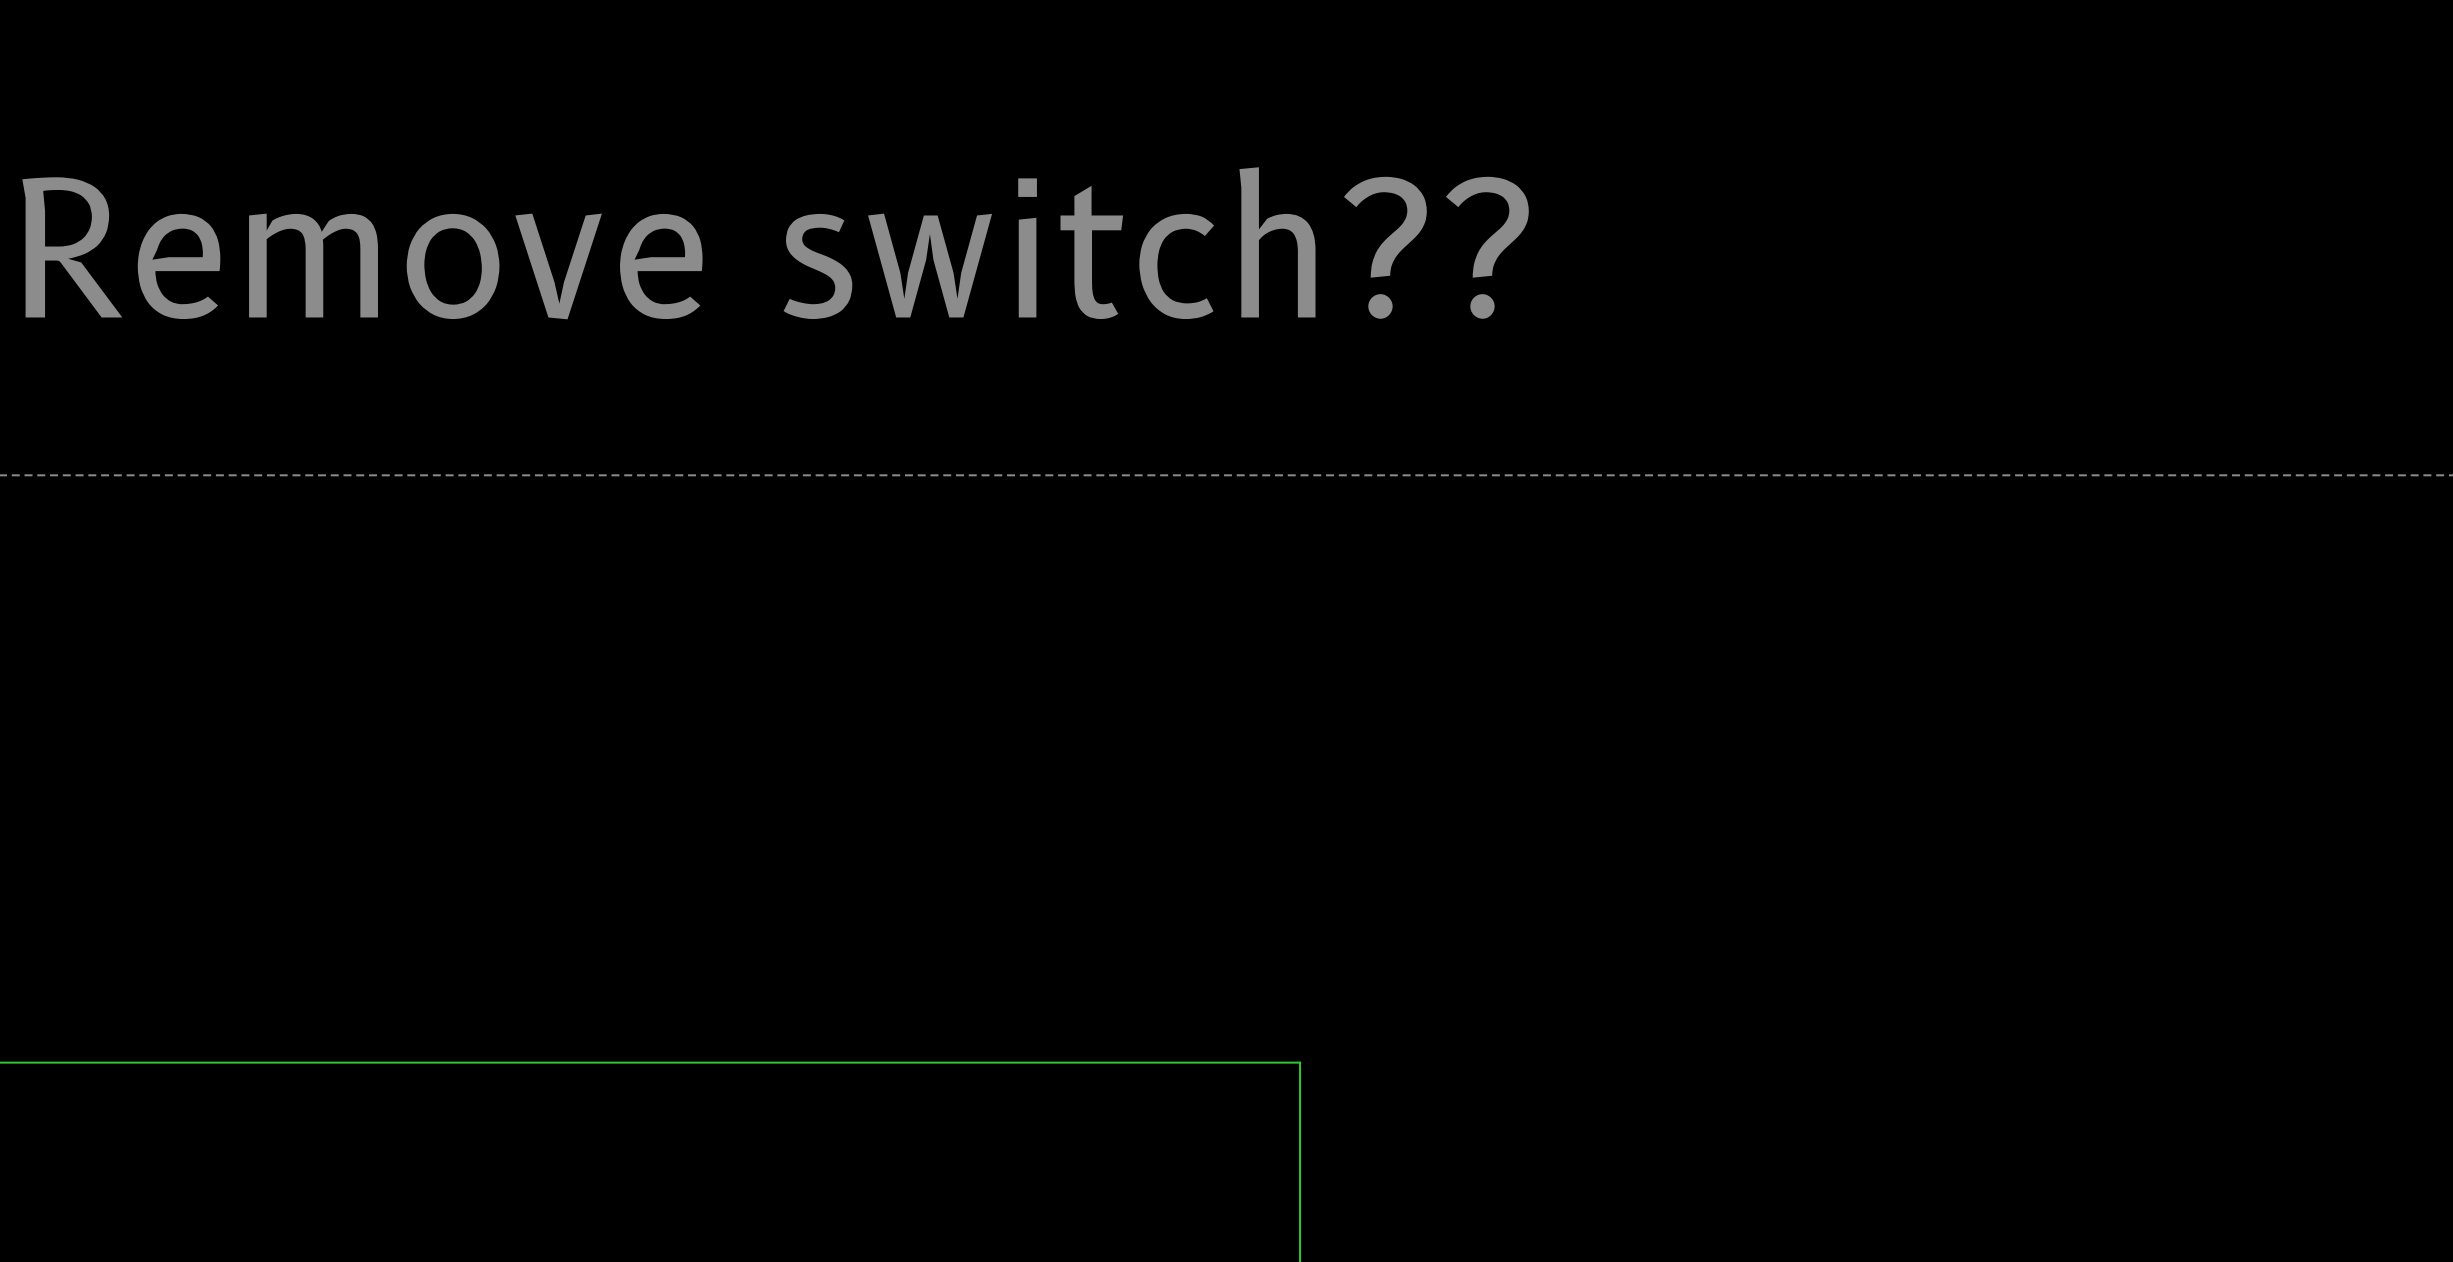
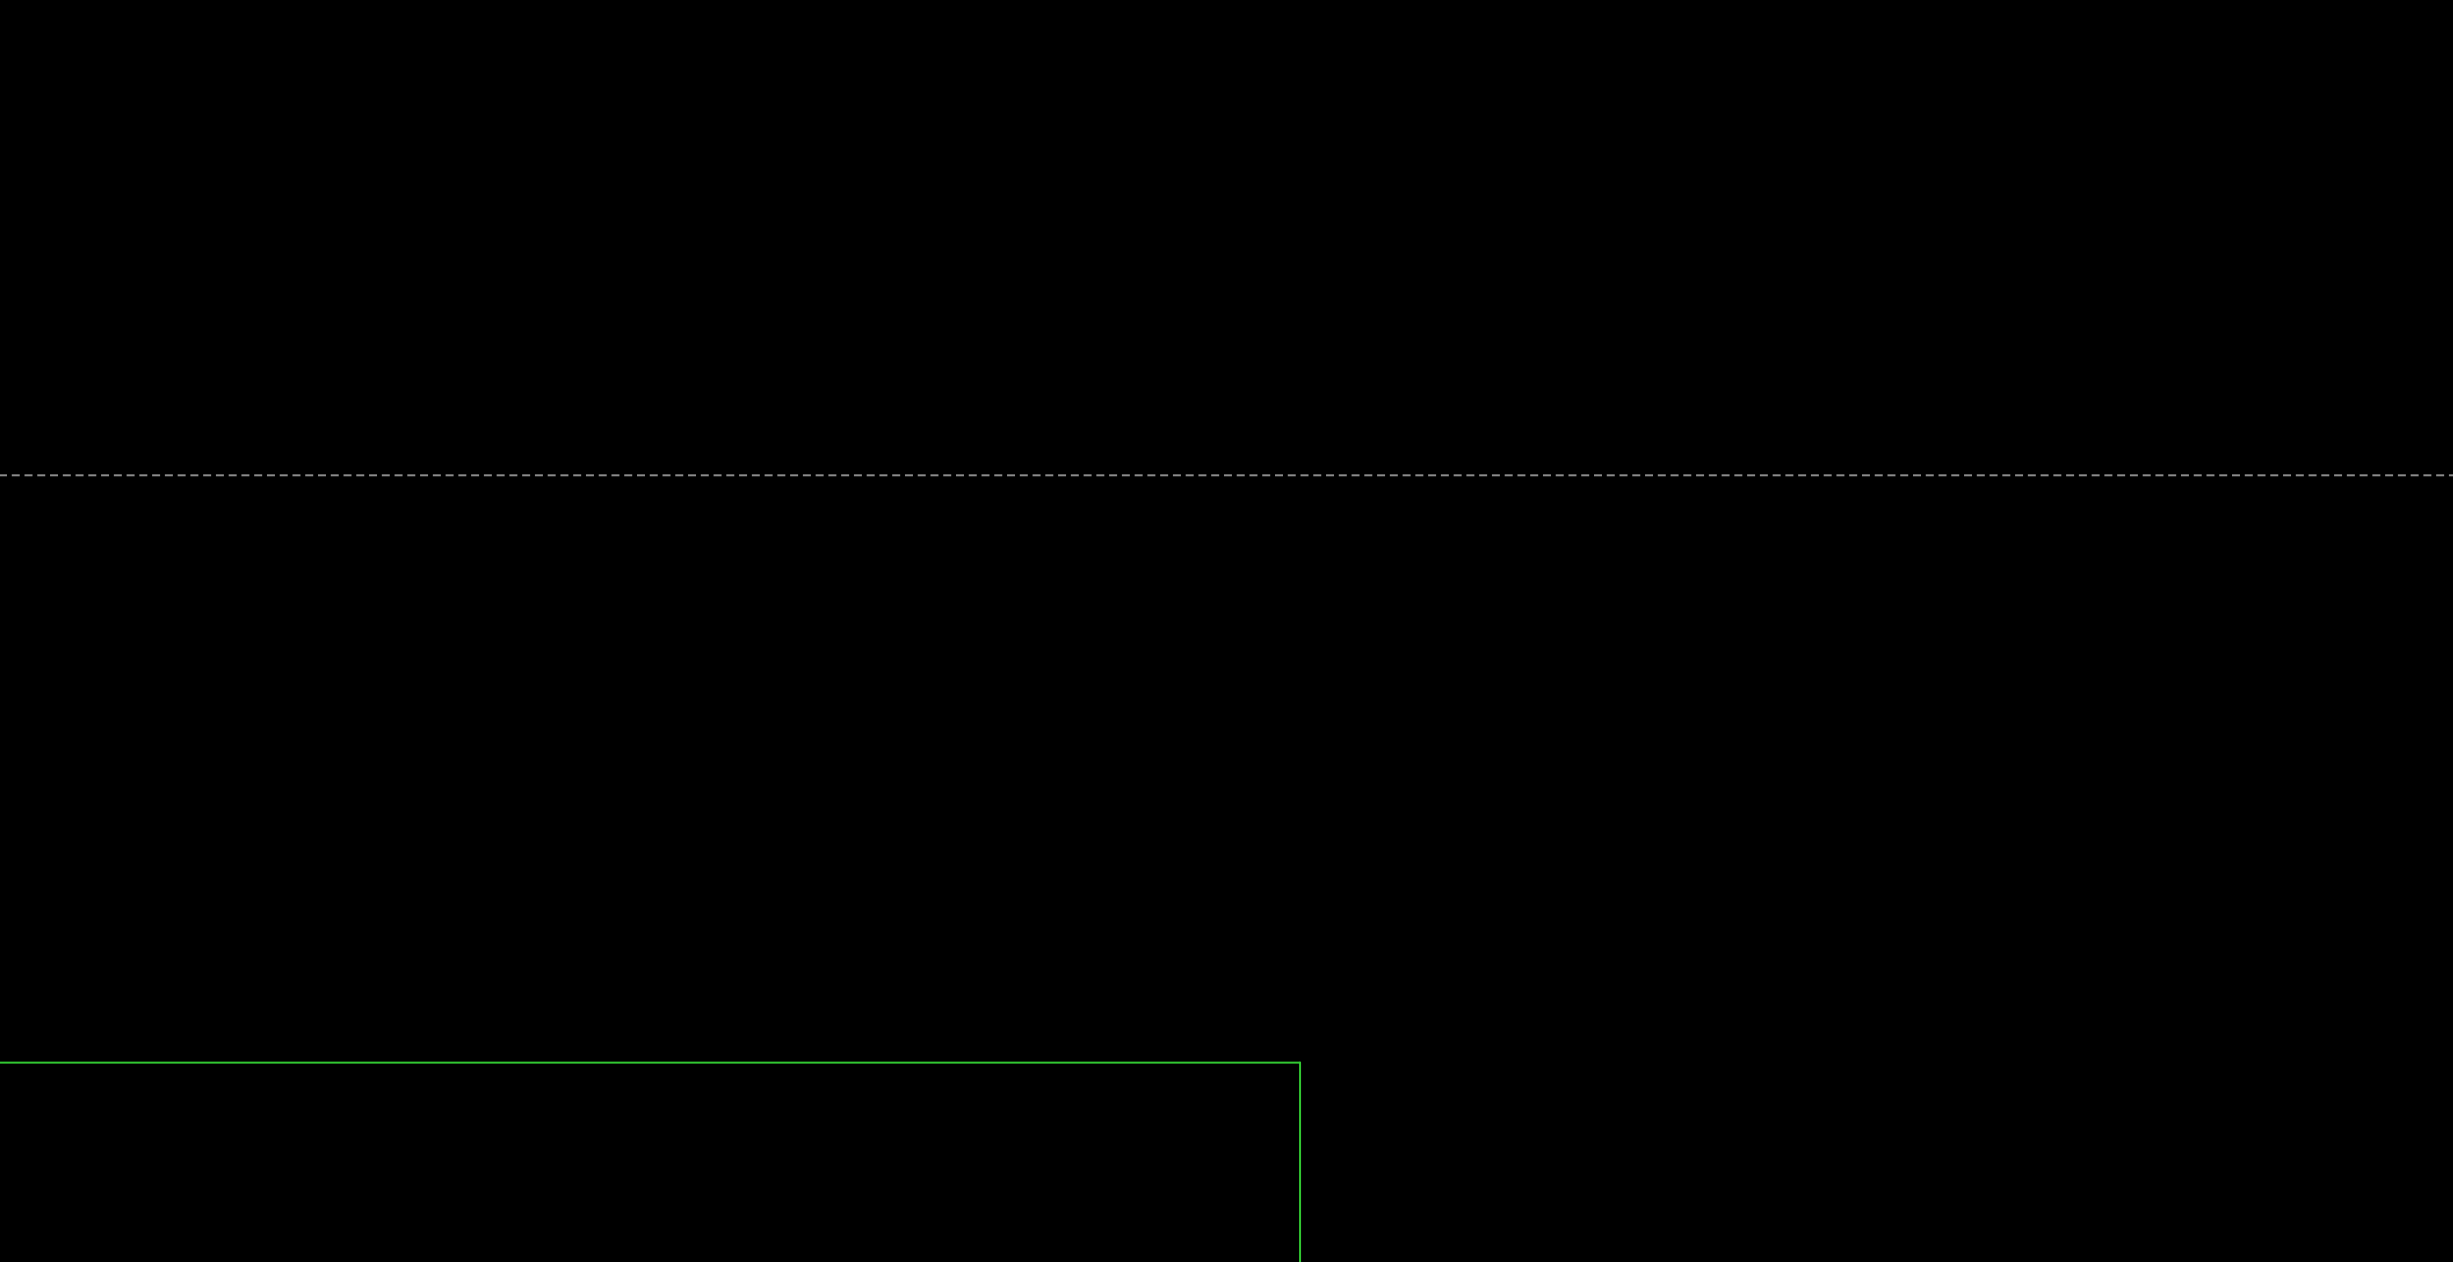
text: Remove switch?? (775, 243) -> none

